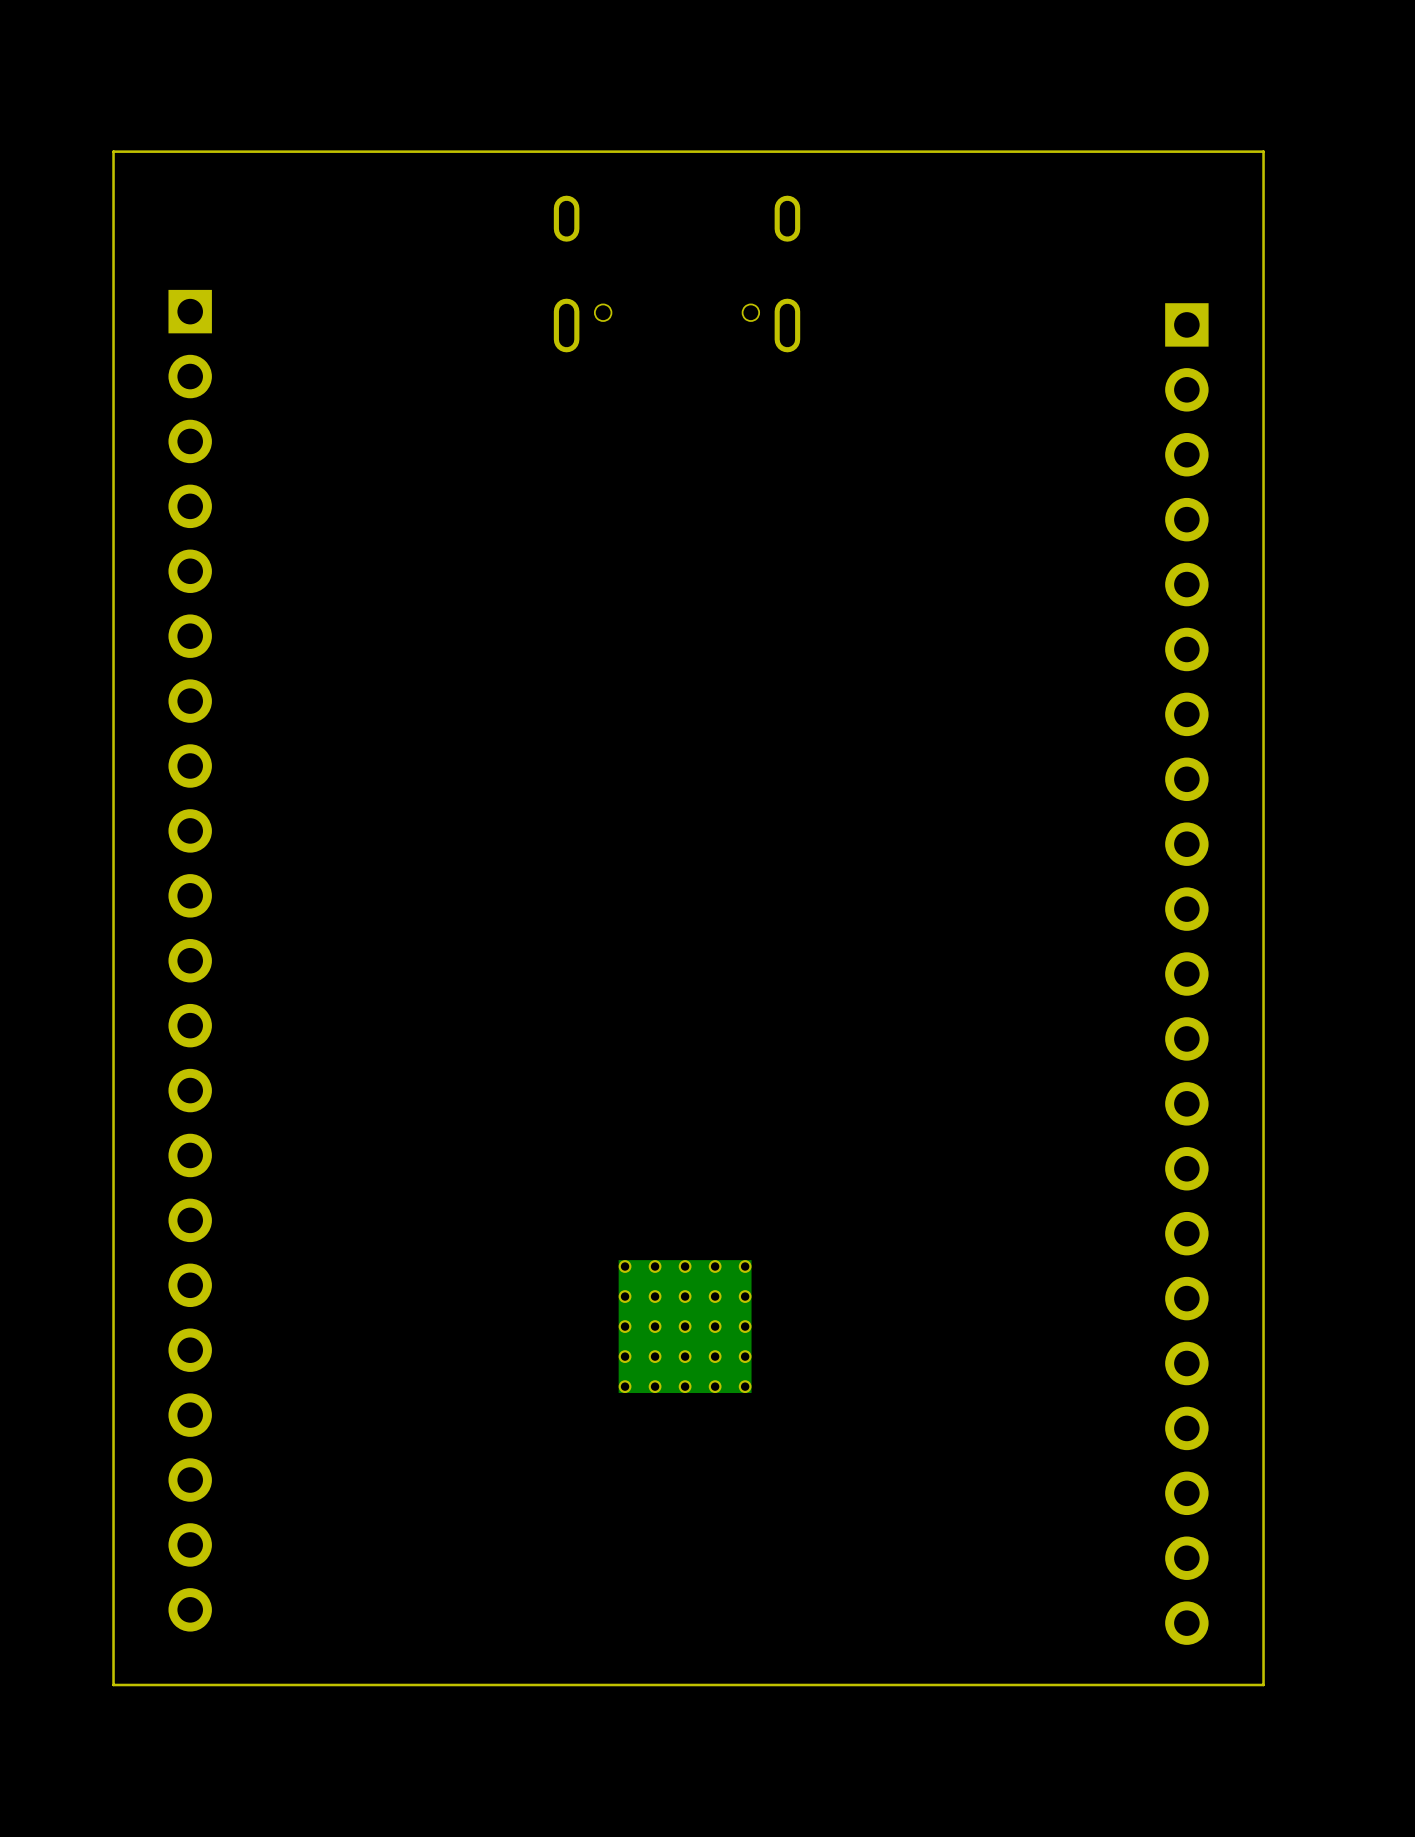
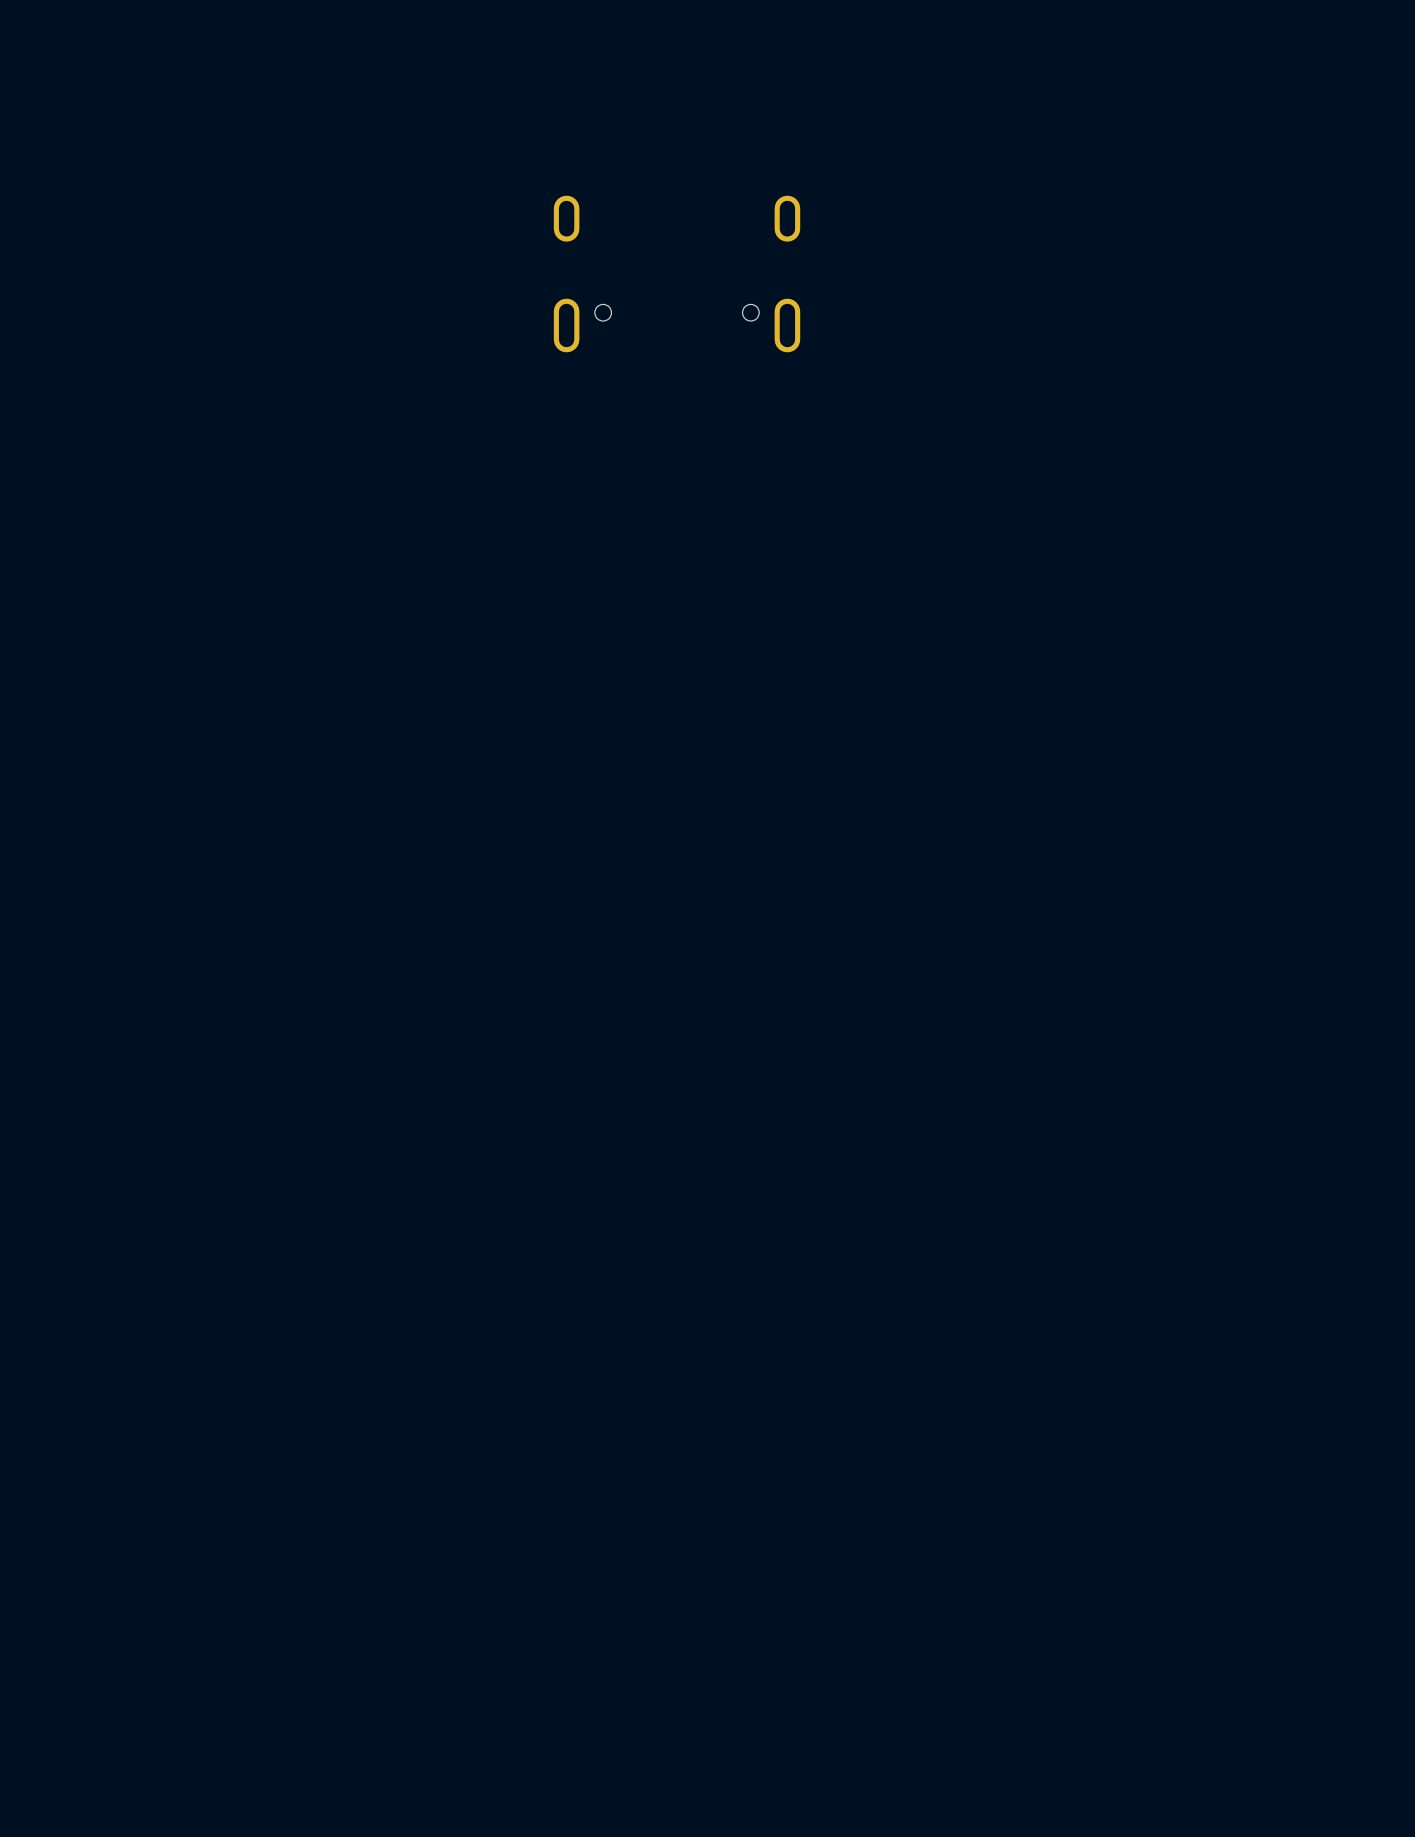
board edge: (1263, 151) (113, 151) (113, 1684) (1263, 1684) (1263, 151) -> none
part: (190, 960) -> none
part: (1186, 974) -> none
part: (685, 1326) -> none

